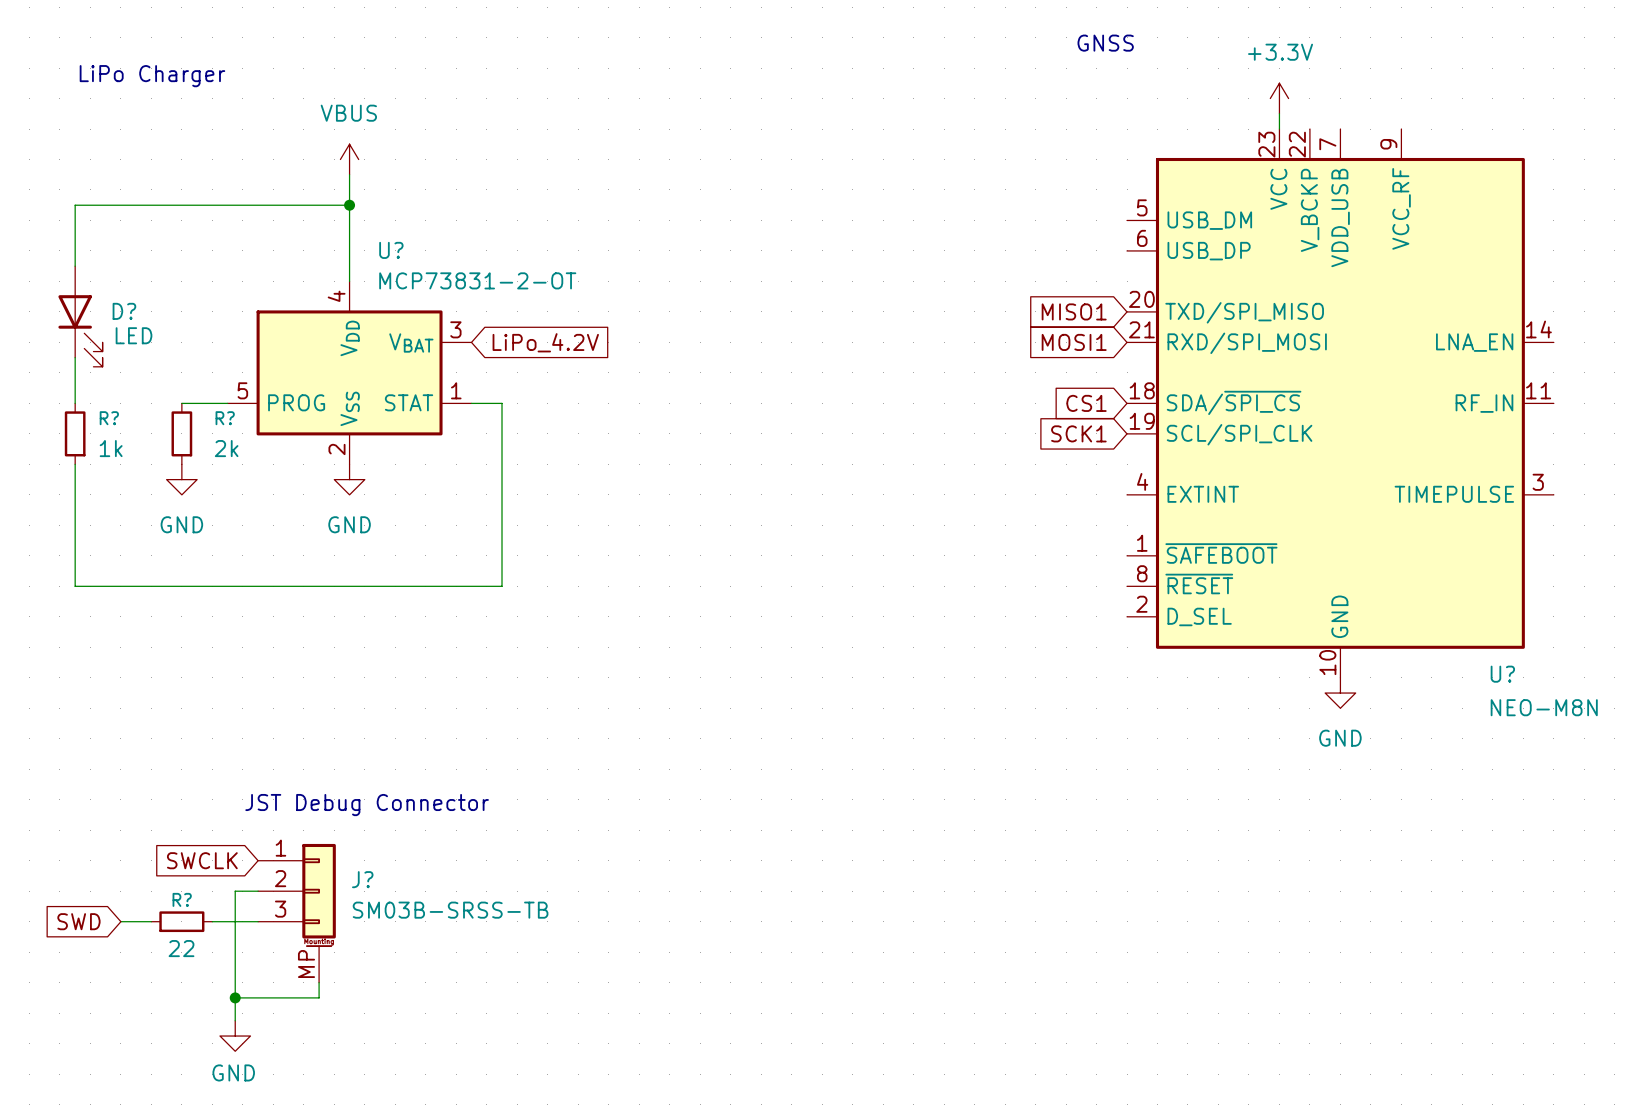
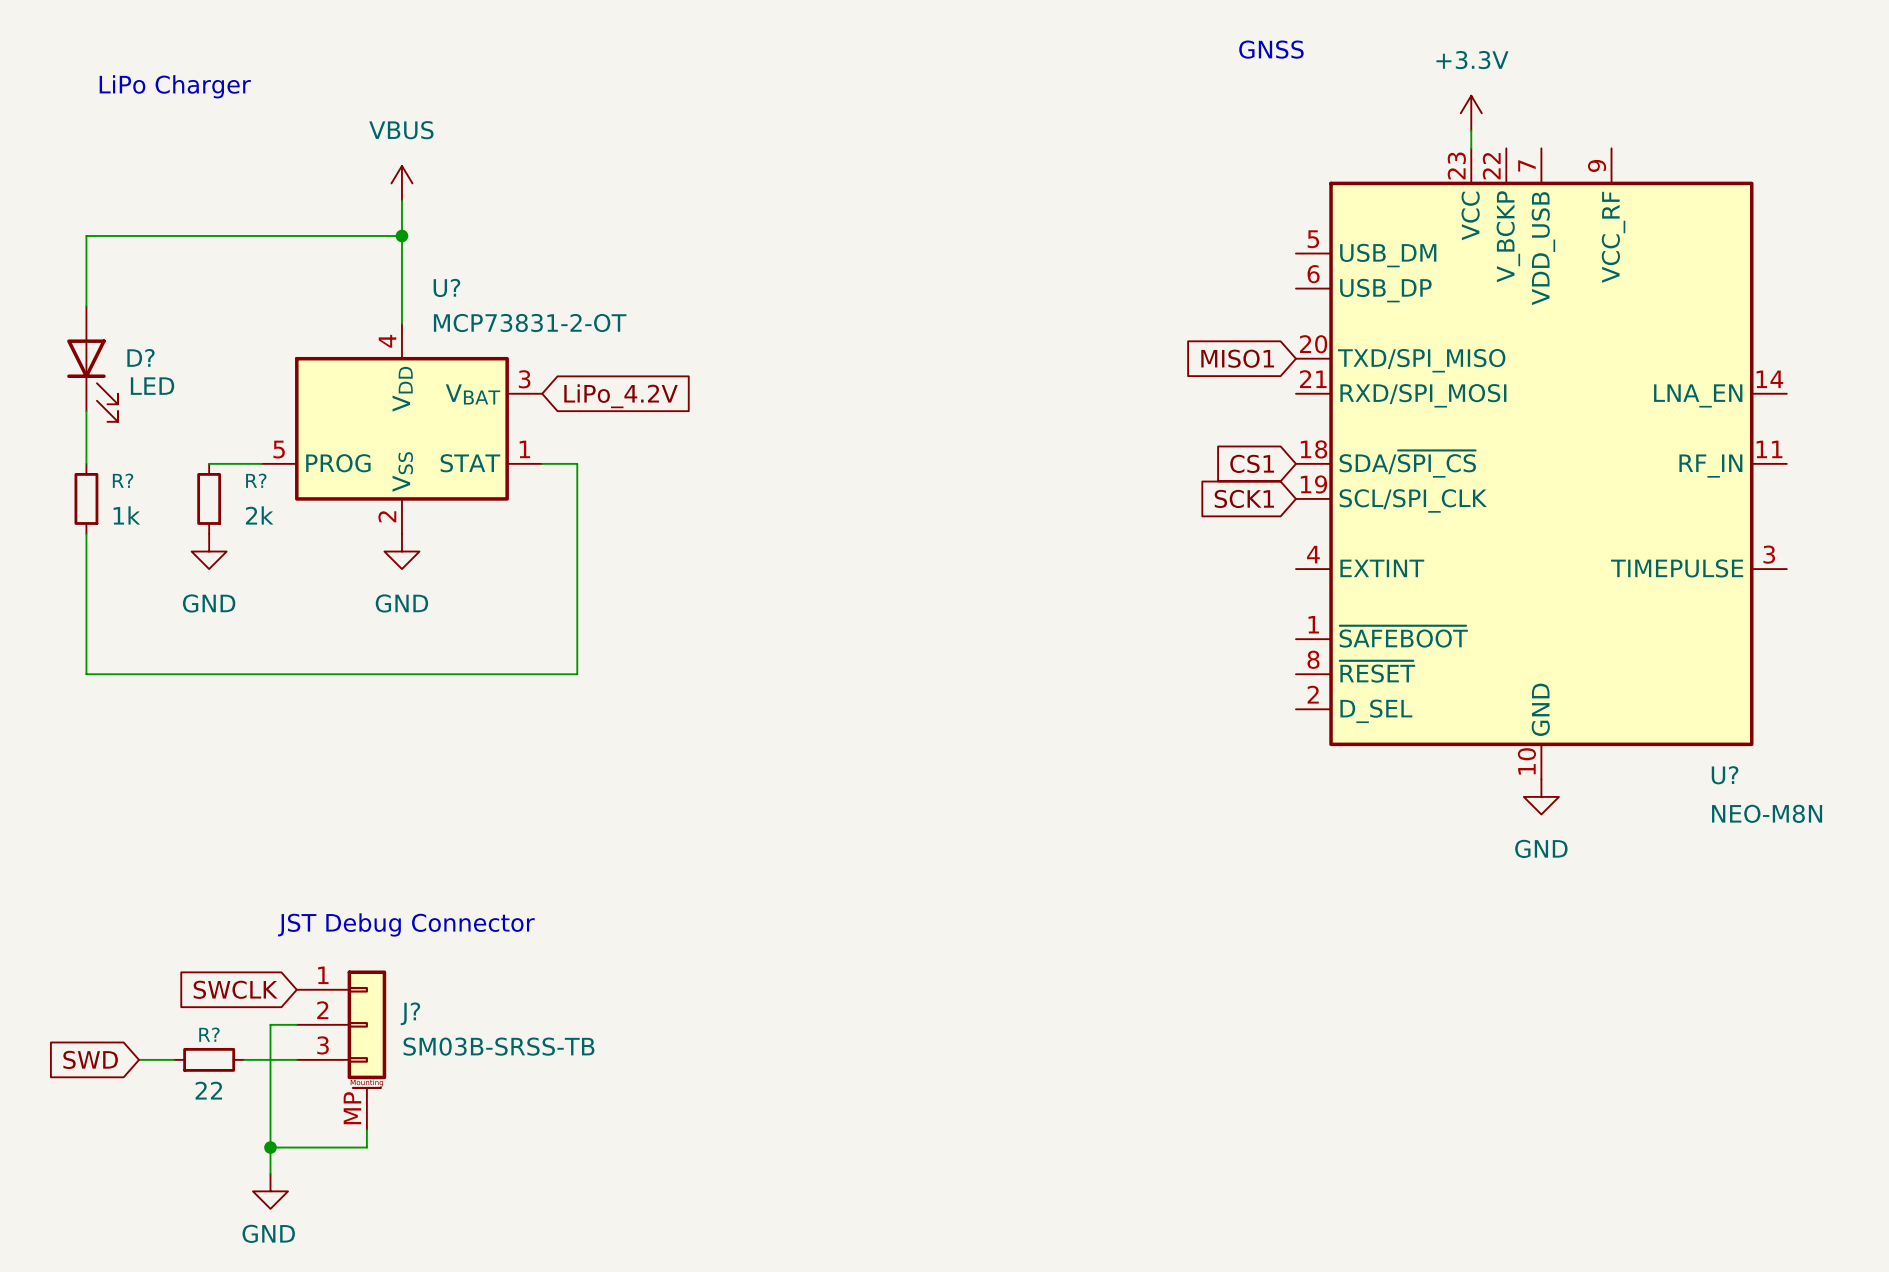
global label: MOSI1 (1074, 342) -> none

